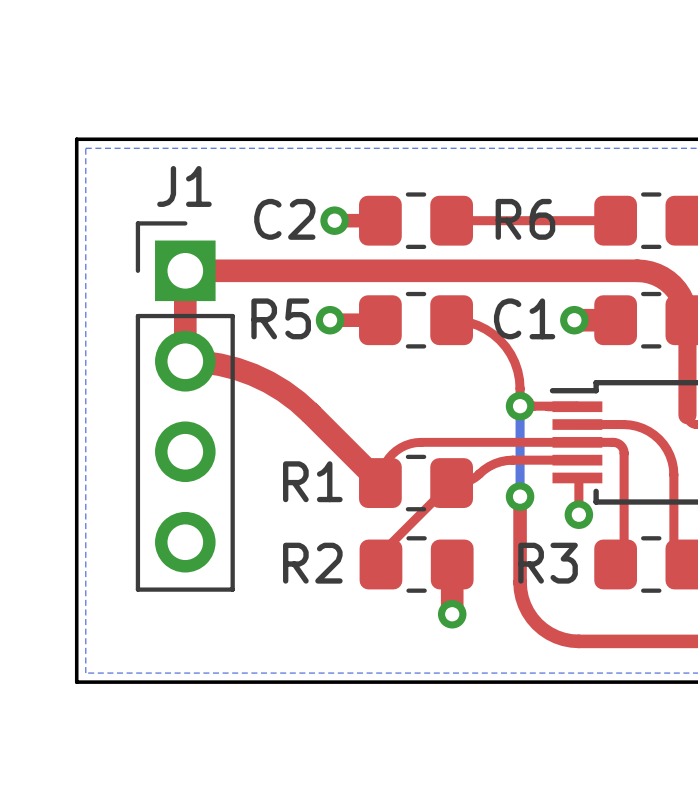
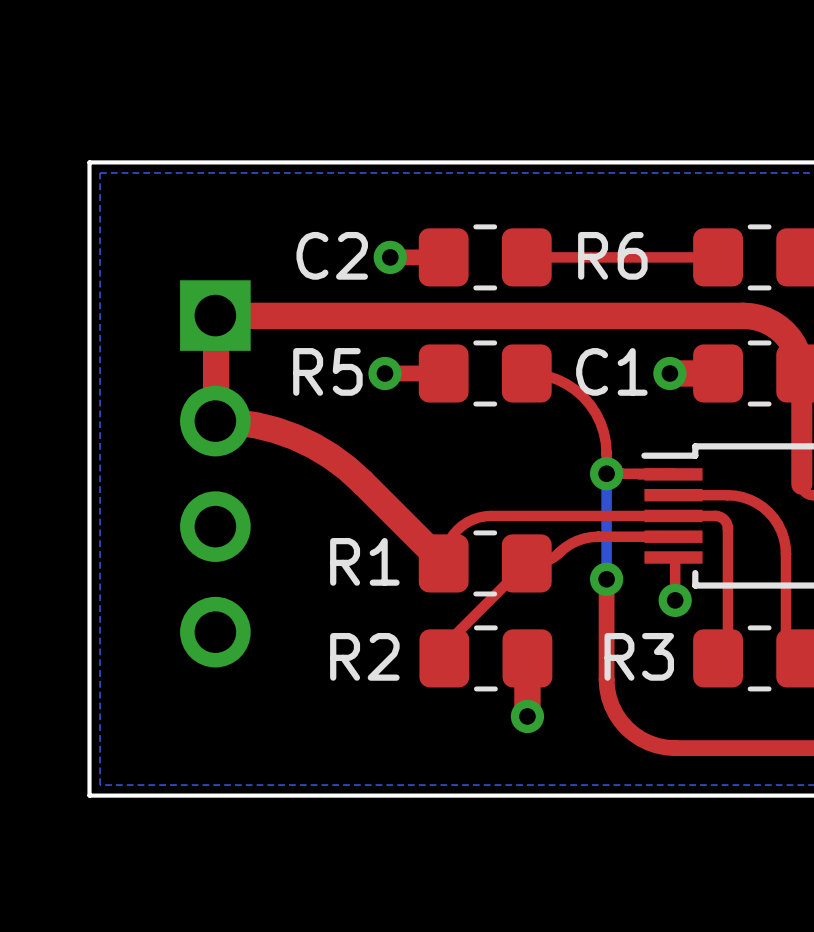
J1 side: top (185, 406) -> bottom (215, 473)

